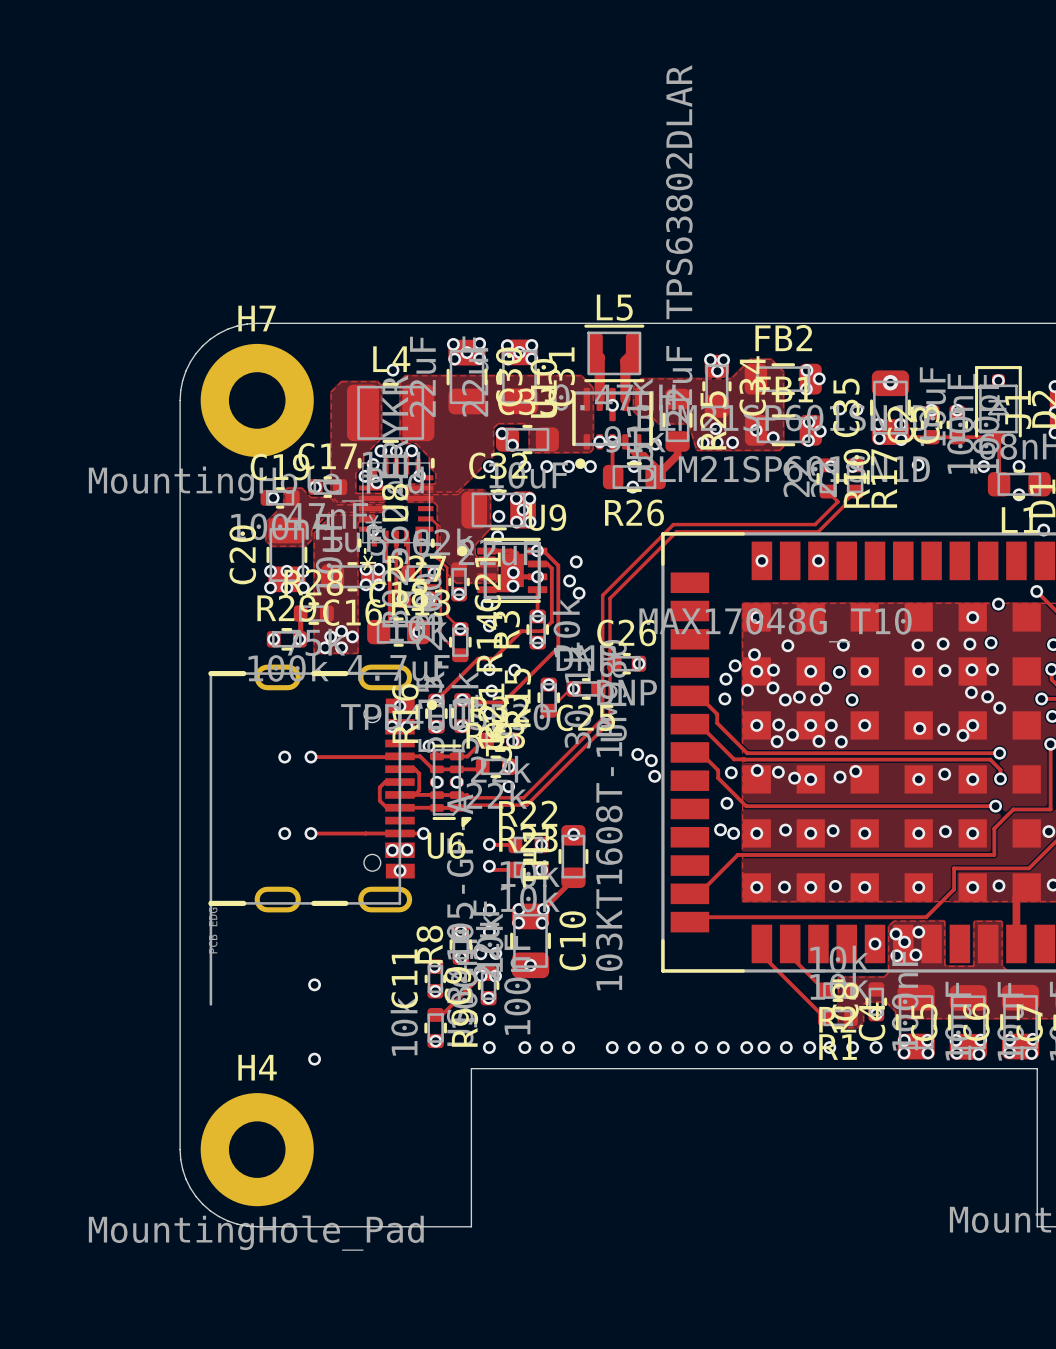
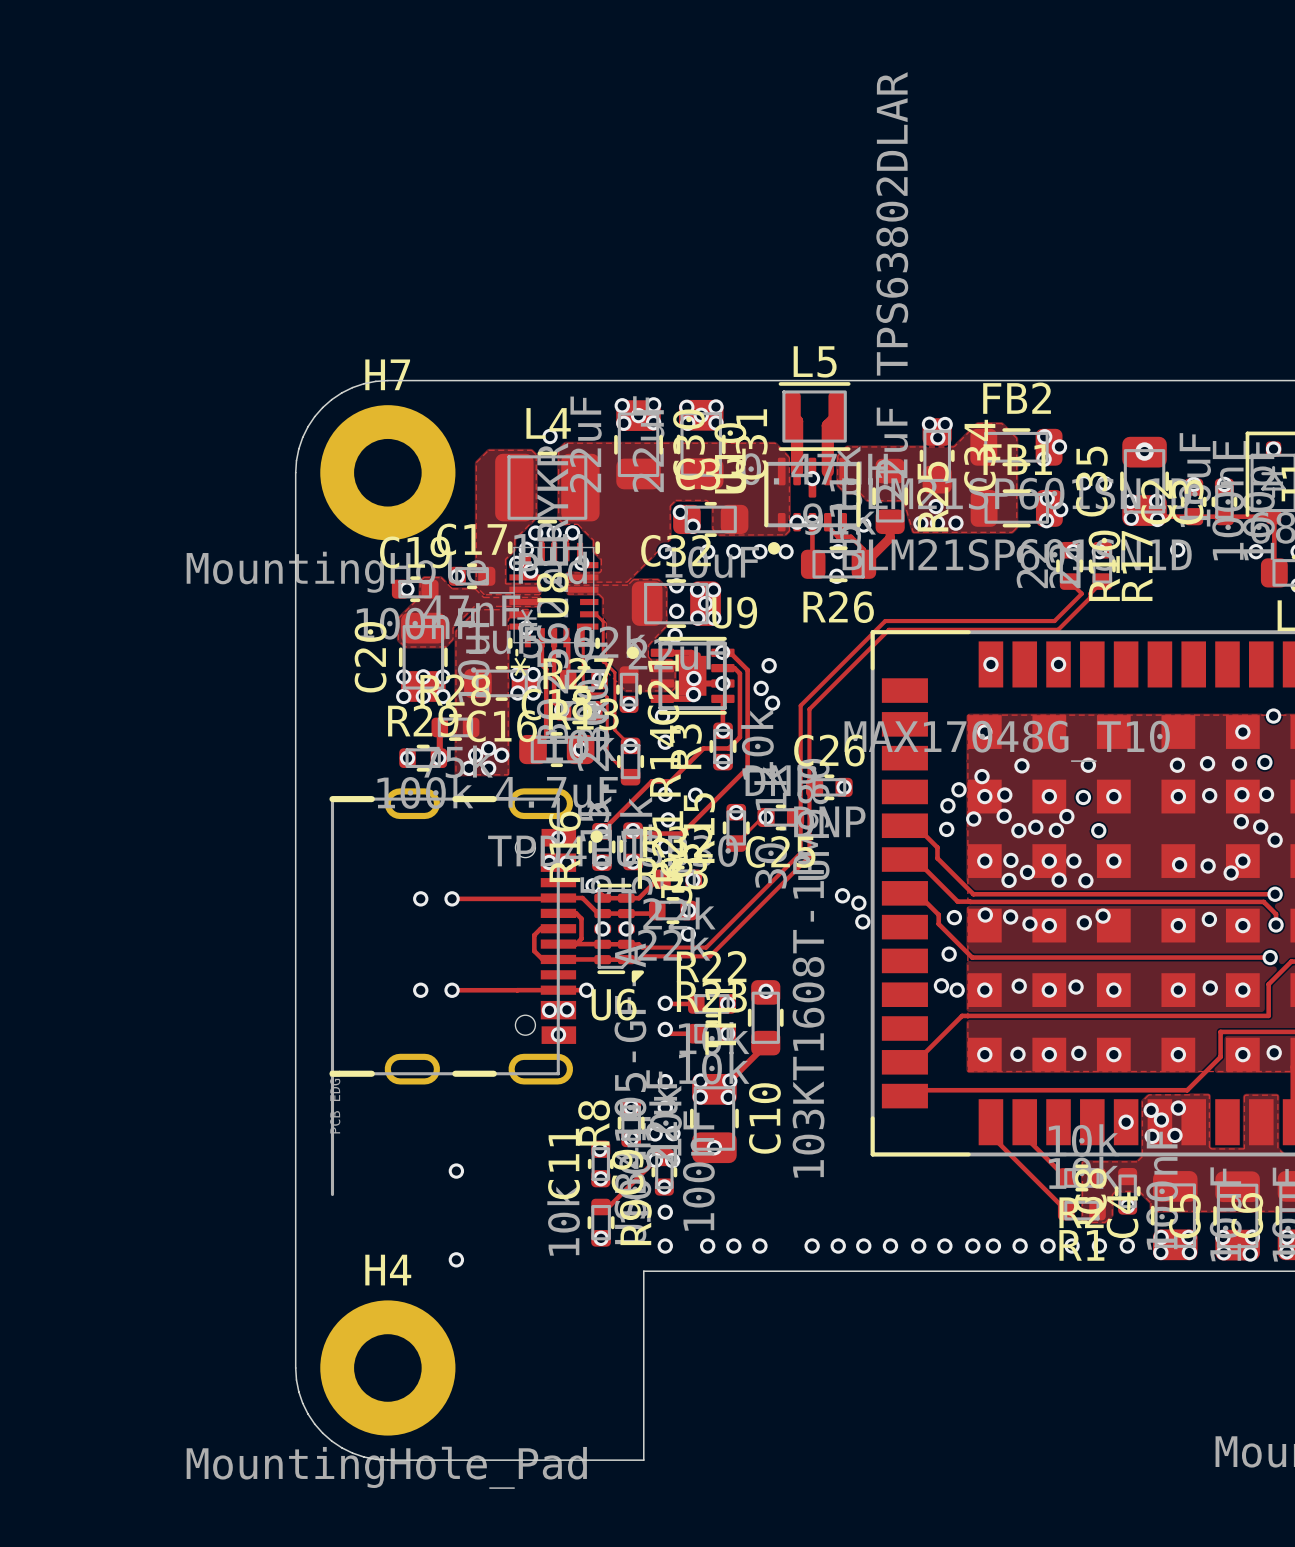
via: (756, 430) -> none
via: (773, 437) -> none

